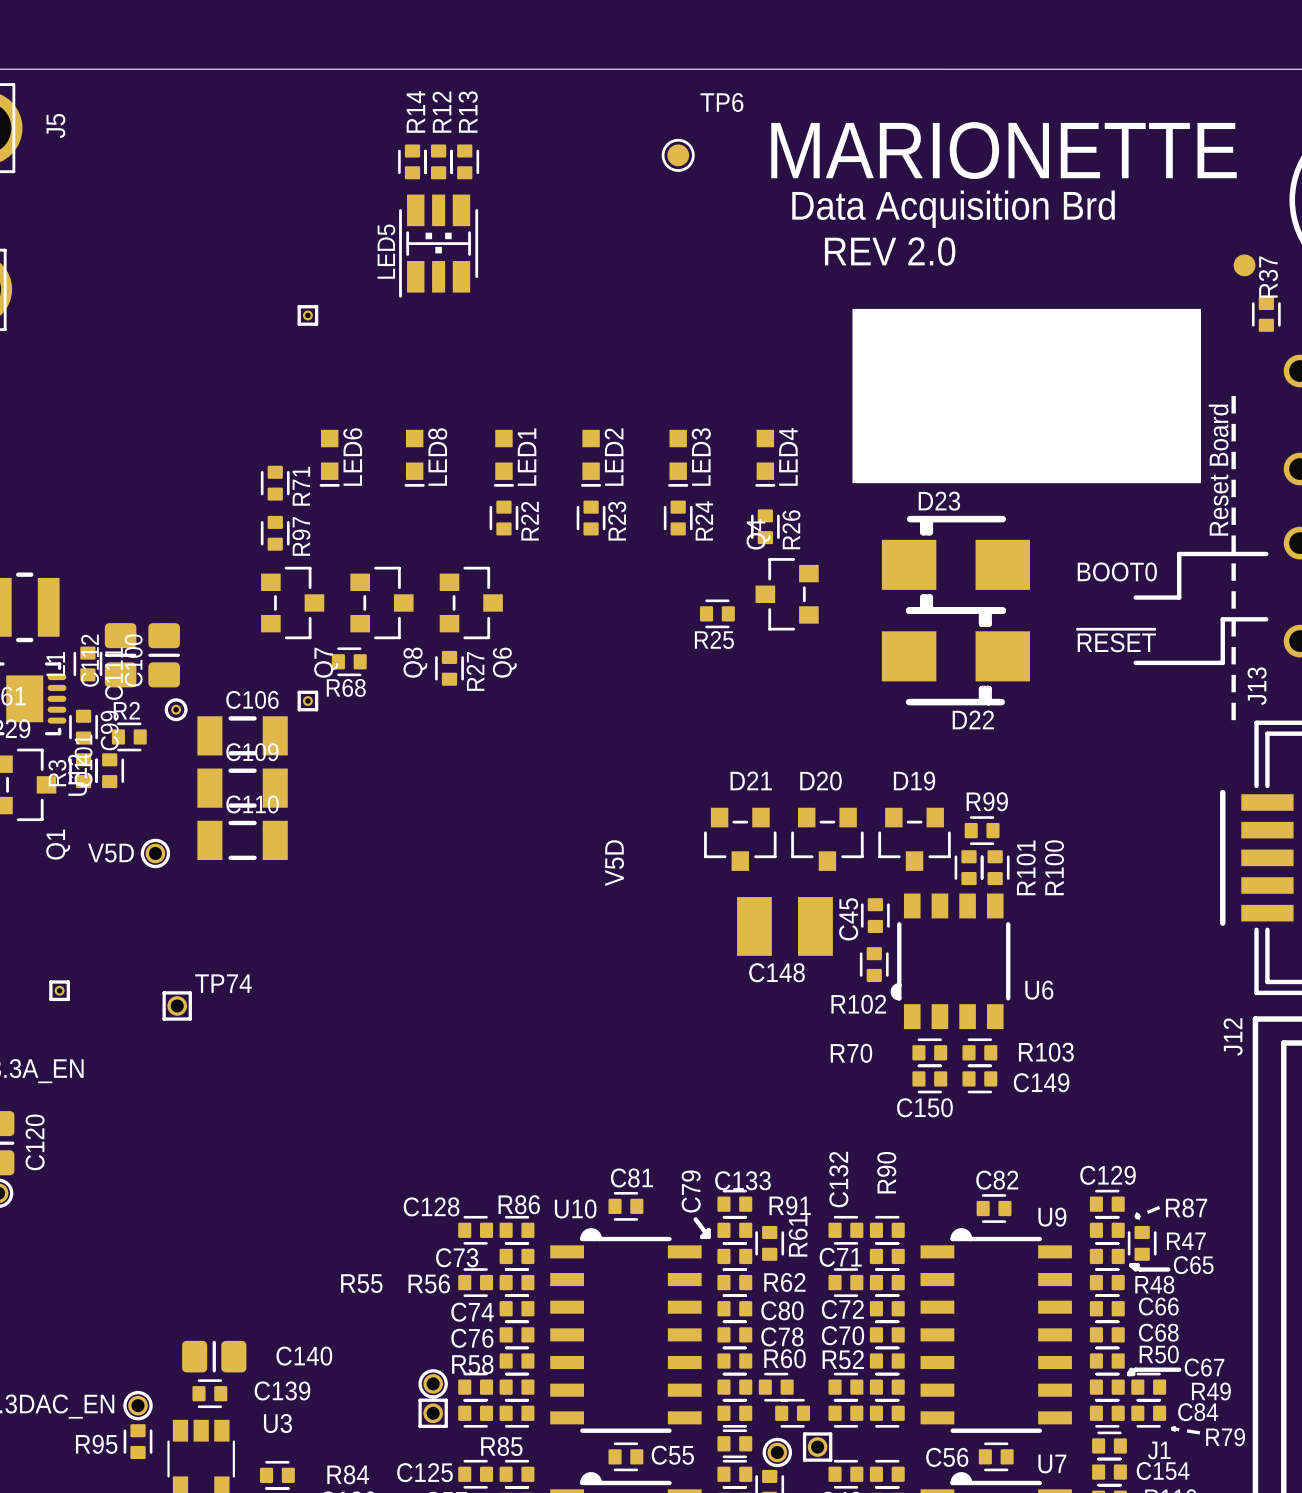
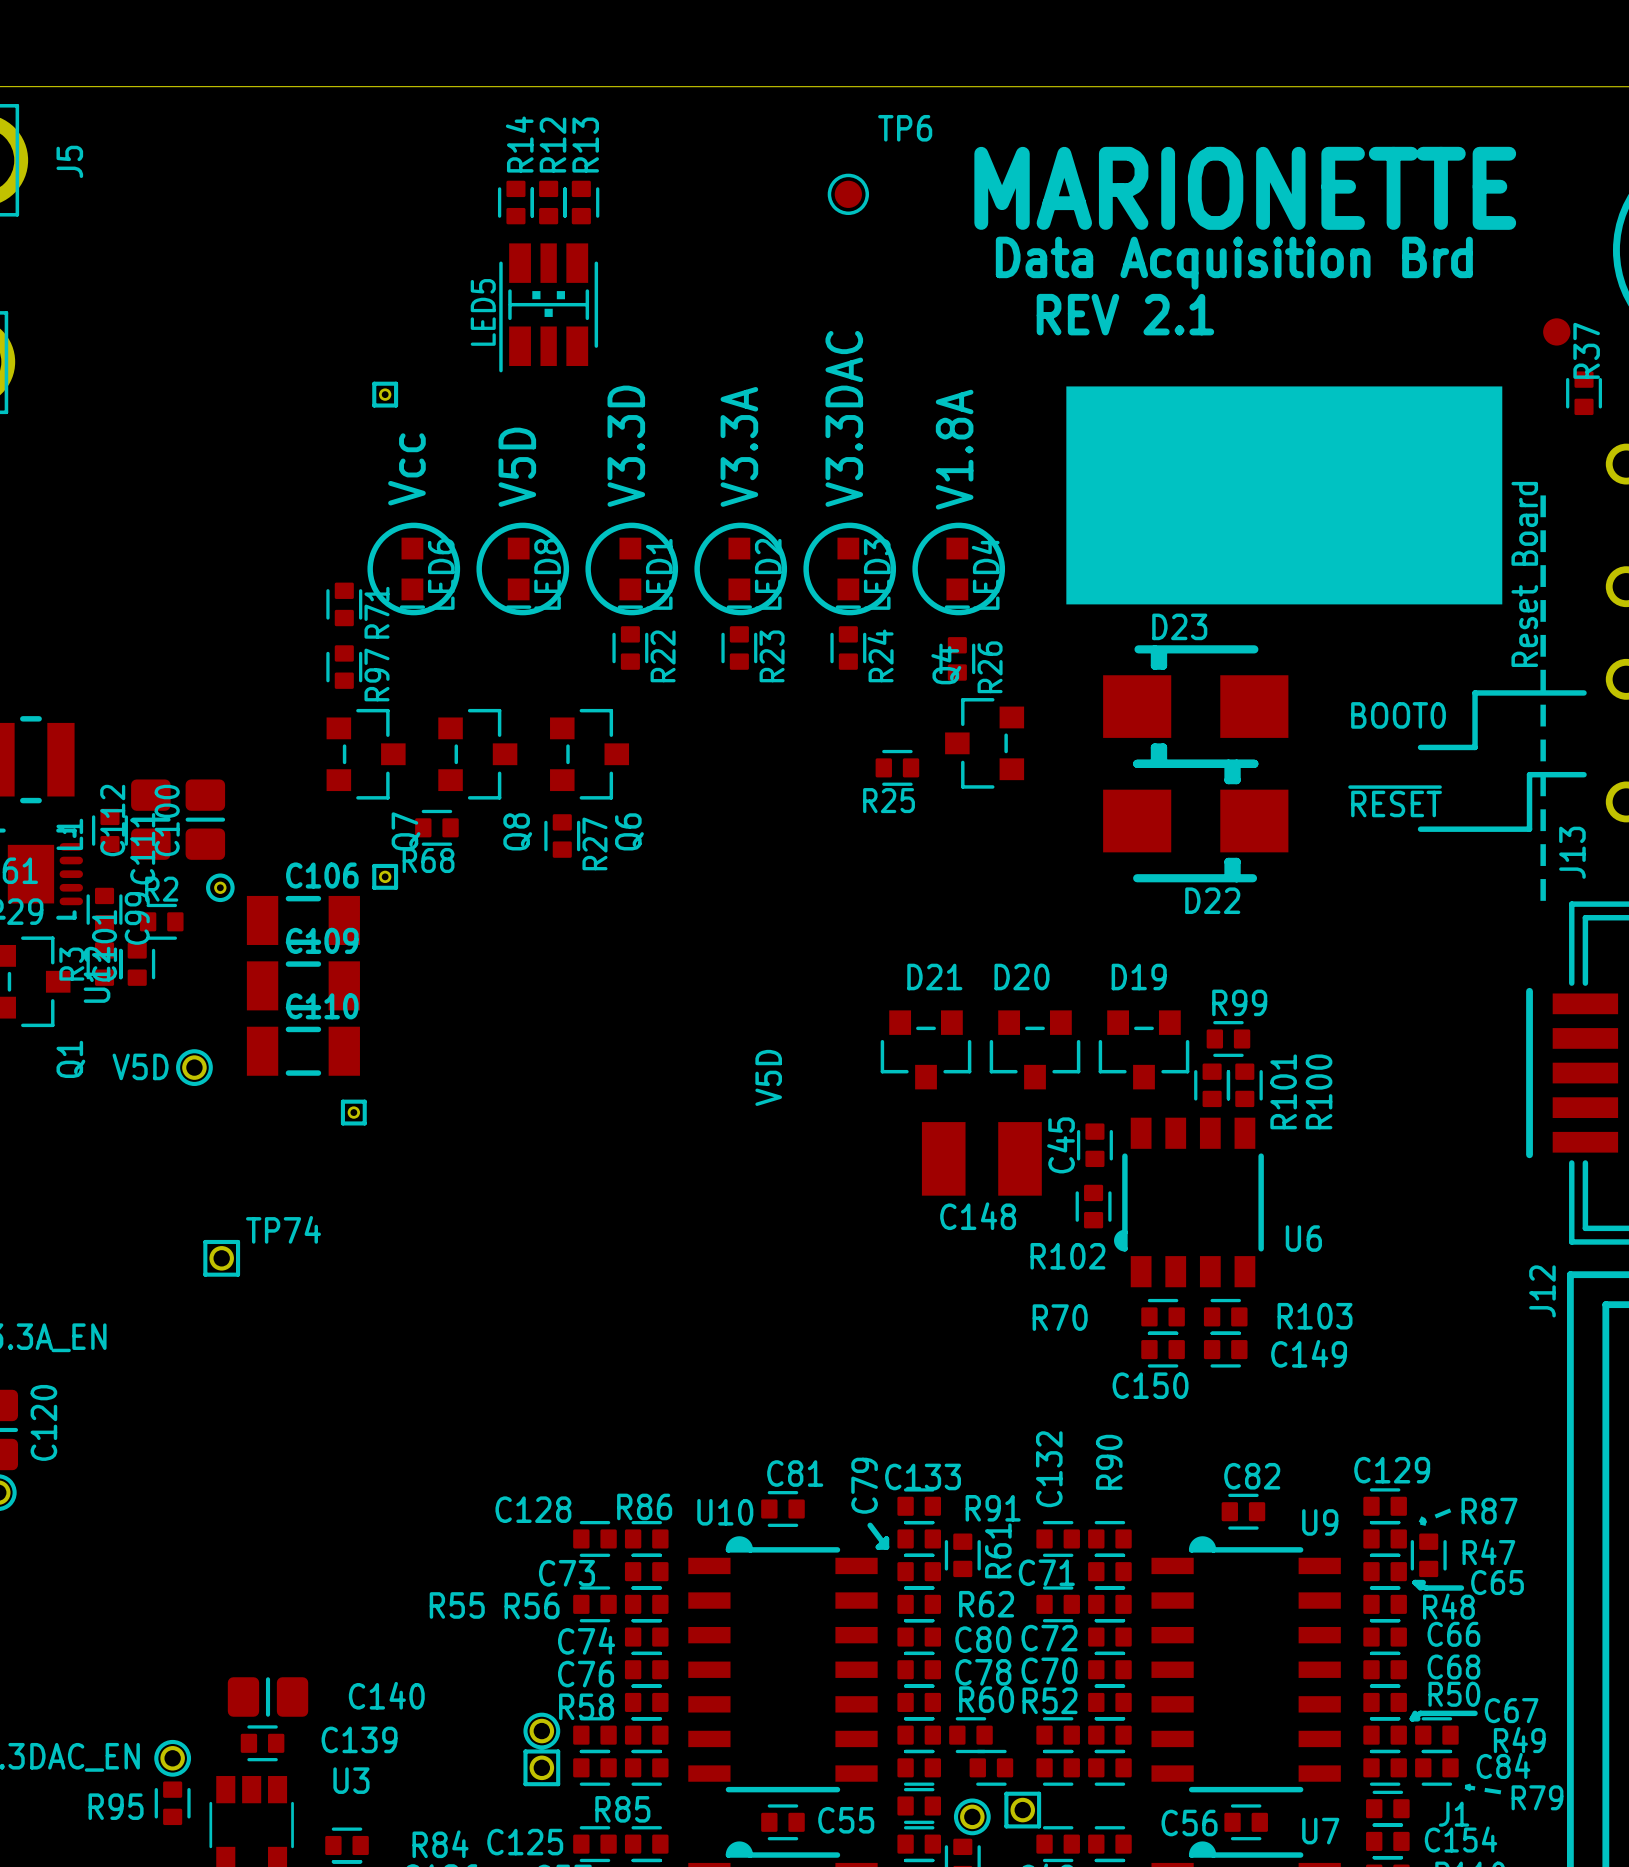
text: REV 2.0 (890, 251) -> REV 2.1 (1125, 314)
text: none -> V3.3DAC (844, 418)
text: none -> V3.3D (626, 446)
text: none -> V3.3A (739, 446)
text: none -> V1.8A (954, 449)
text: none -> V5D (517, 467)
text: none -> Vcc (406, 469)
drawing: none -> [367, 522, 1006, 616]
part position: (59, 990) -> (353, 1112)

